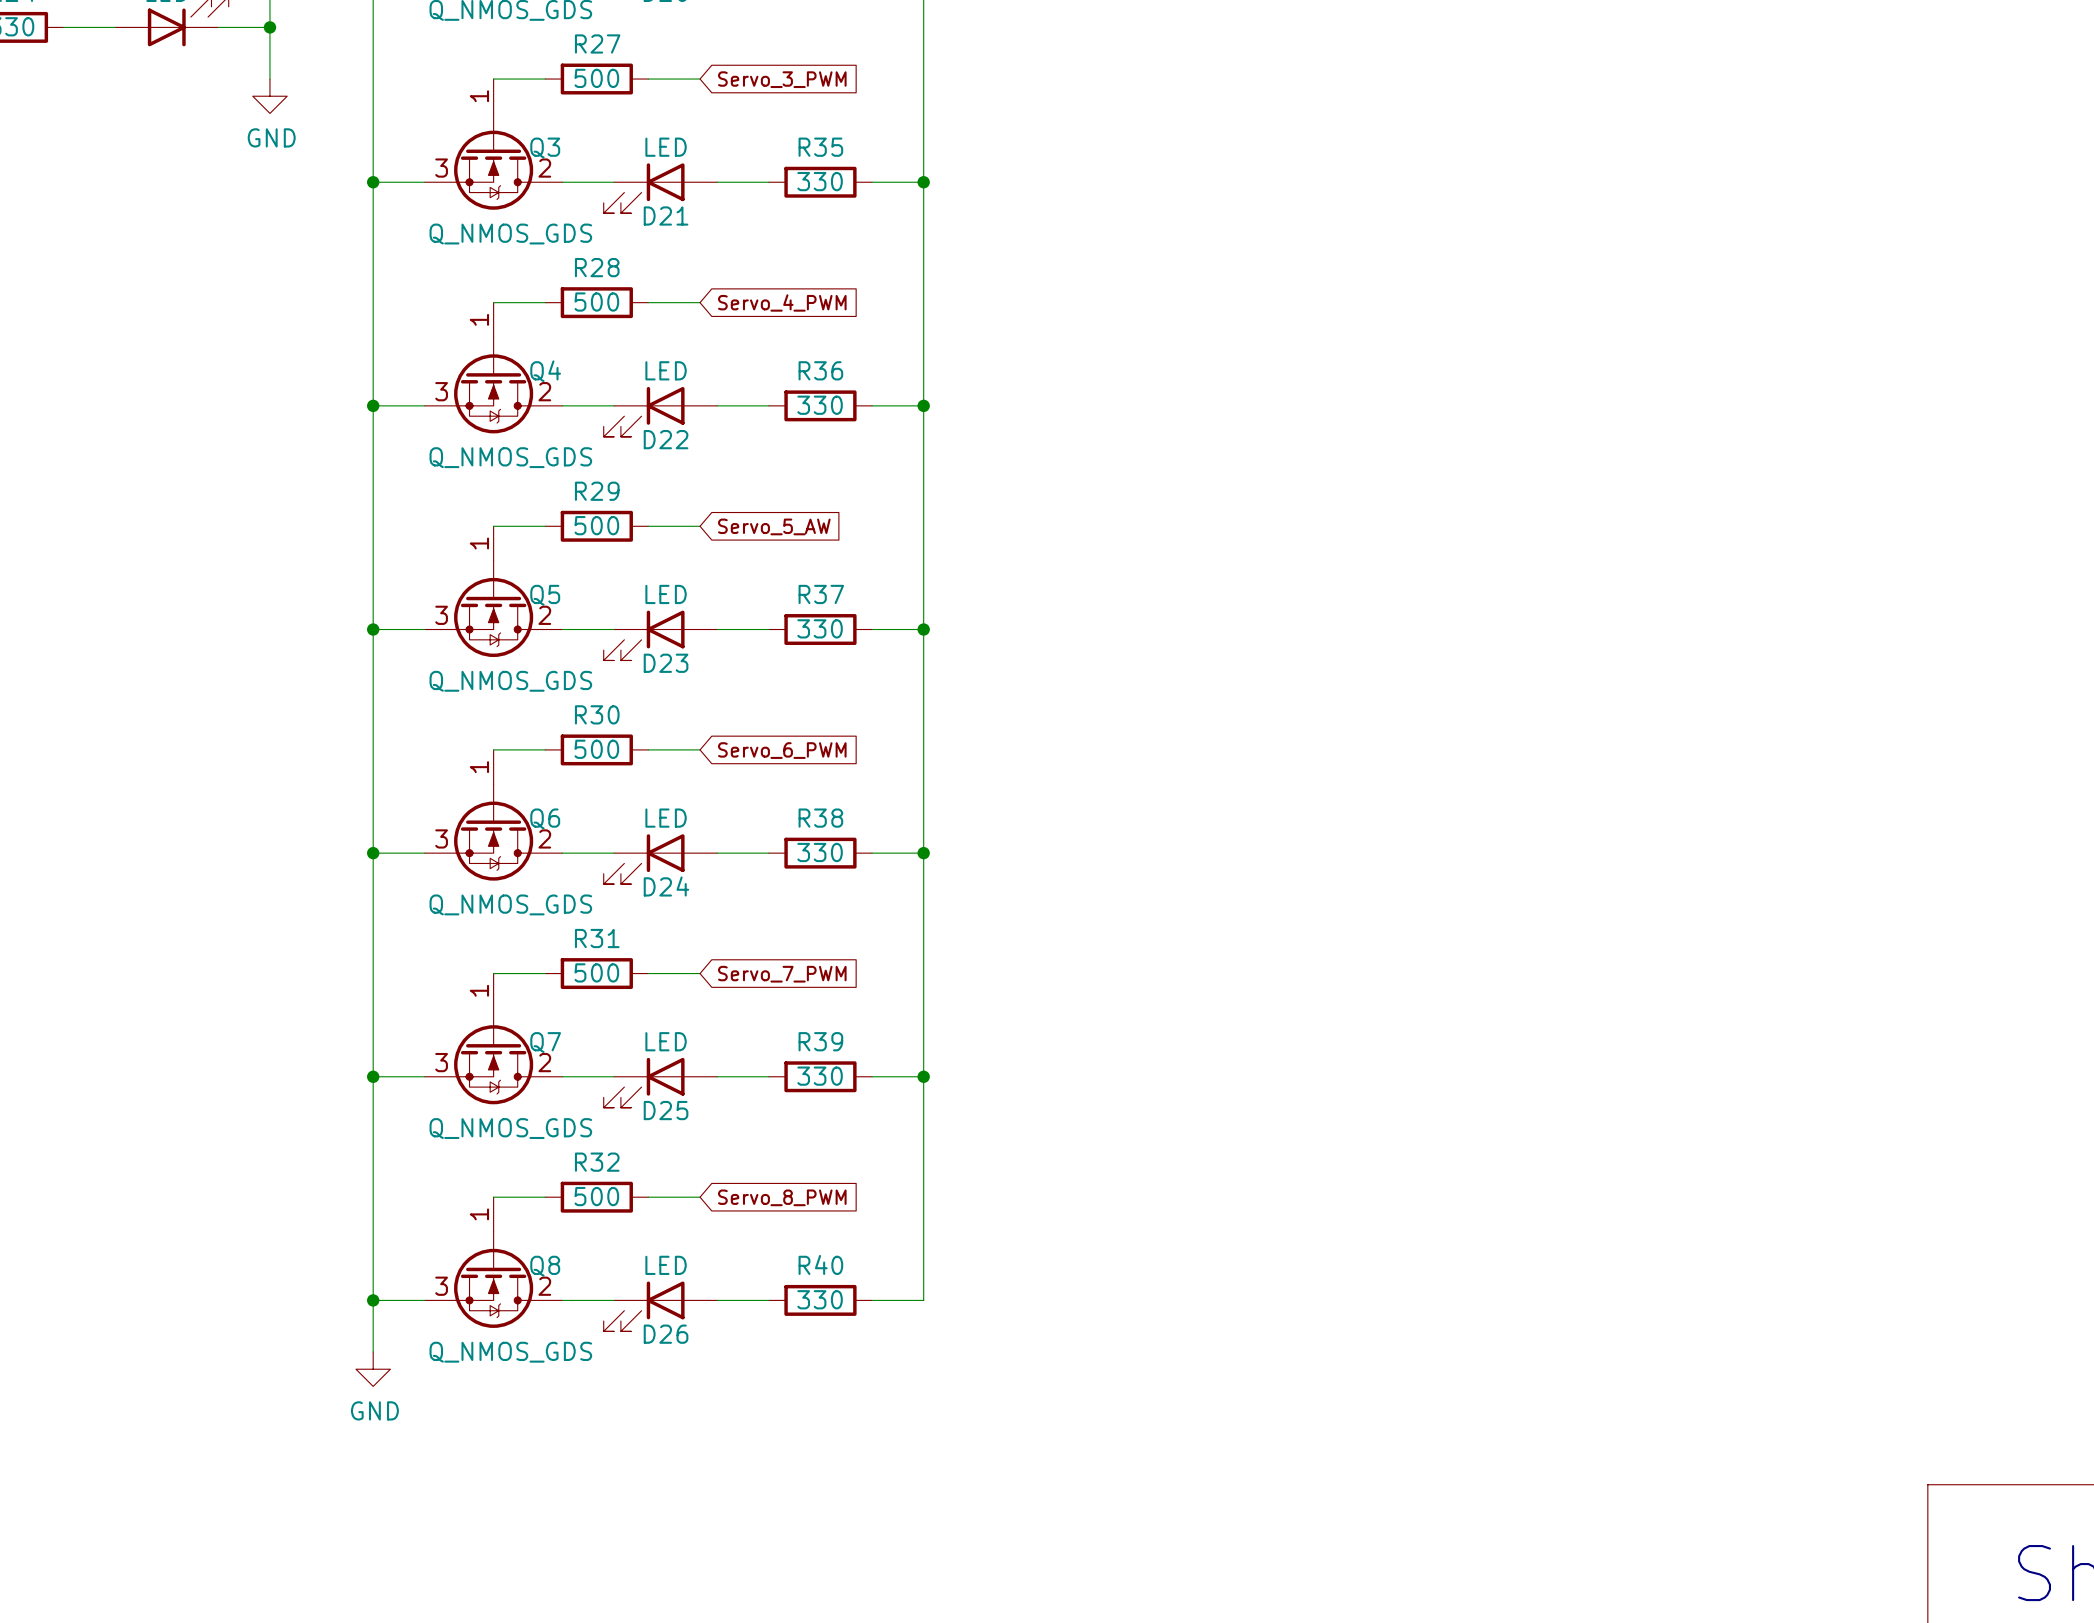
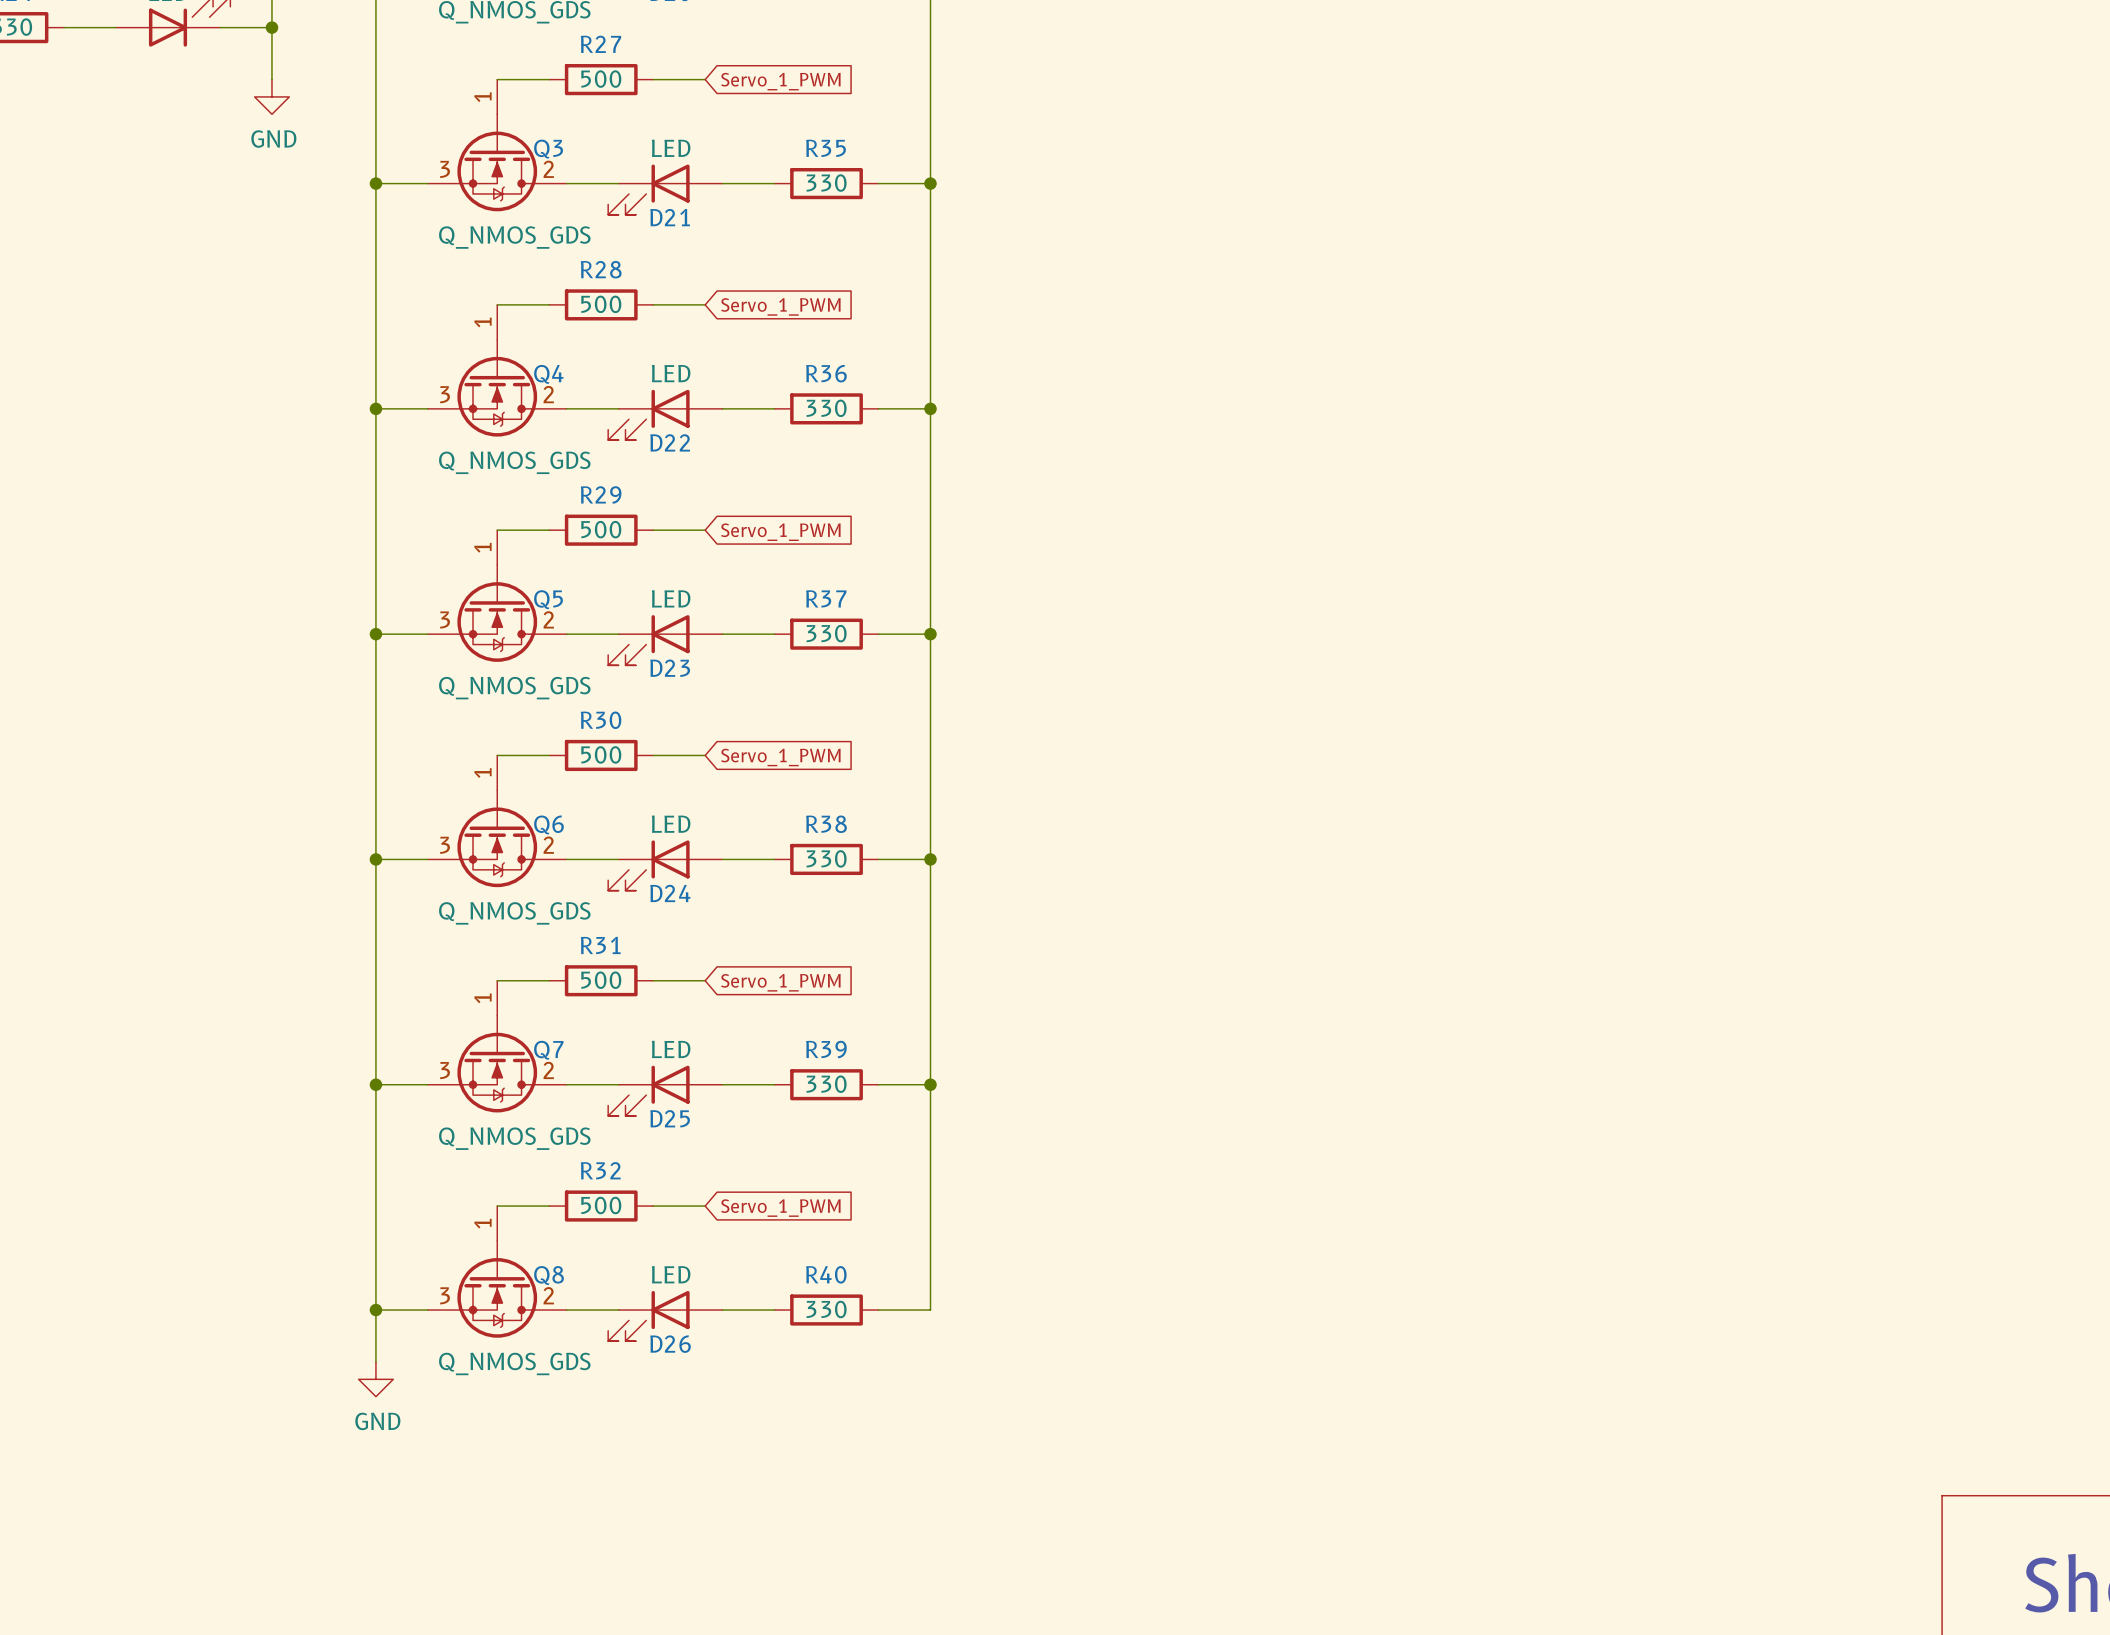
global label: Servo_3_PWM (782, 79) -> Servo_1_PWM (780, 81)
global label: Servo_4_PWM (782, 302) -> Servo_1_PWM (780, 306)
global label: Servo_5_AW (774, 526) -> Servo_1_PWM (780, 532)
global label: Servo_6_PWM (782, 750) -> Servo_1_PWM (780, 757)
global label: Servo_7_PWM (782, 974) -> Servo_1_PWM (780, 982)
global label: Servo_8_PWM (782, 1197) -> Servo_1_PWM (780, 1208)

